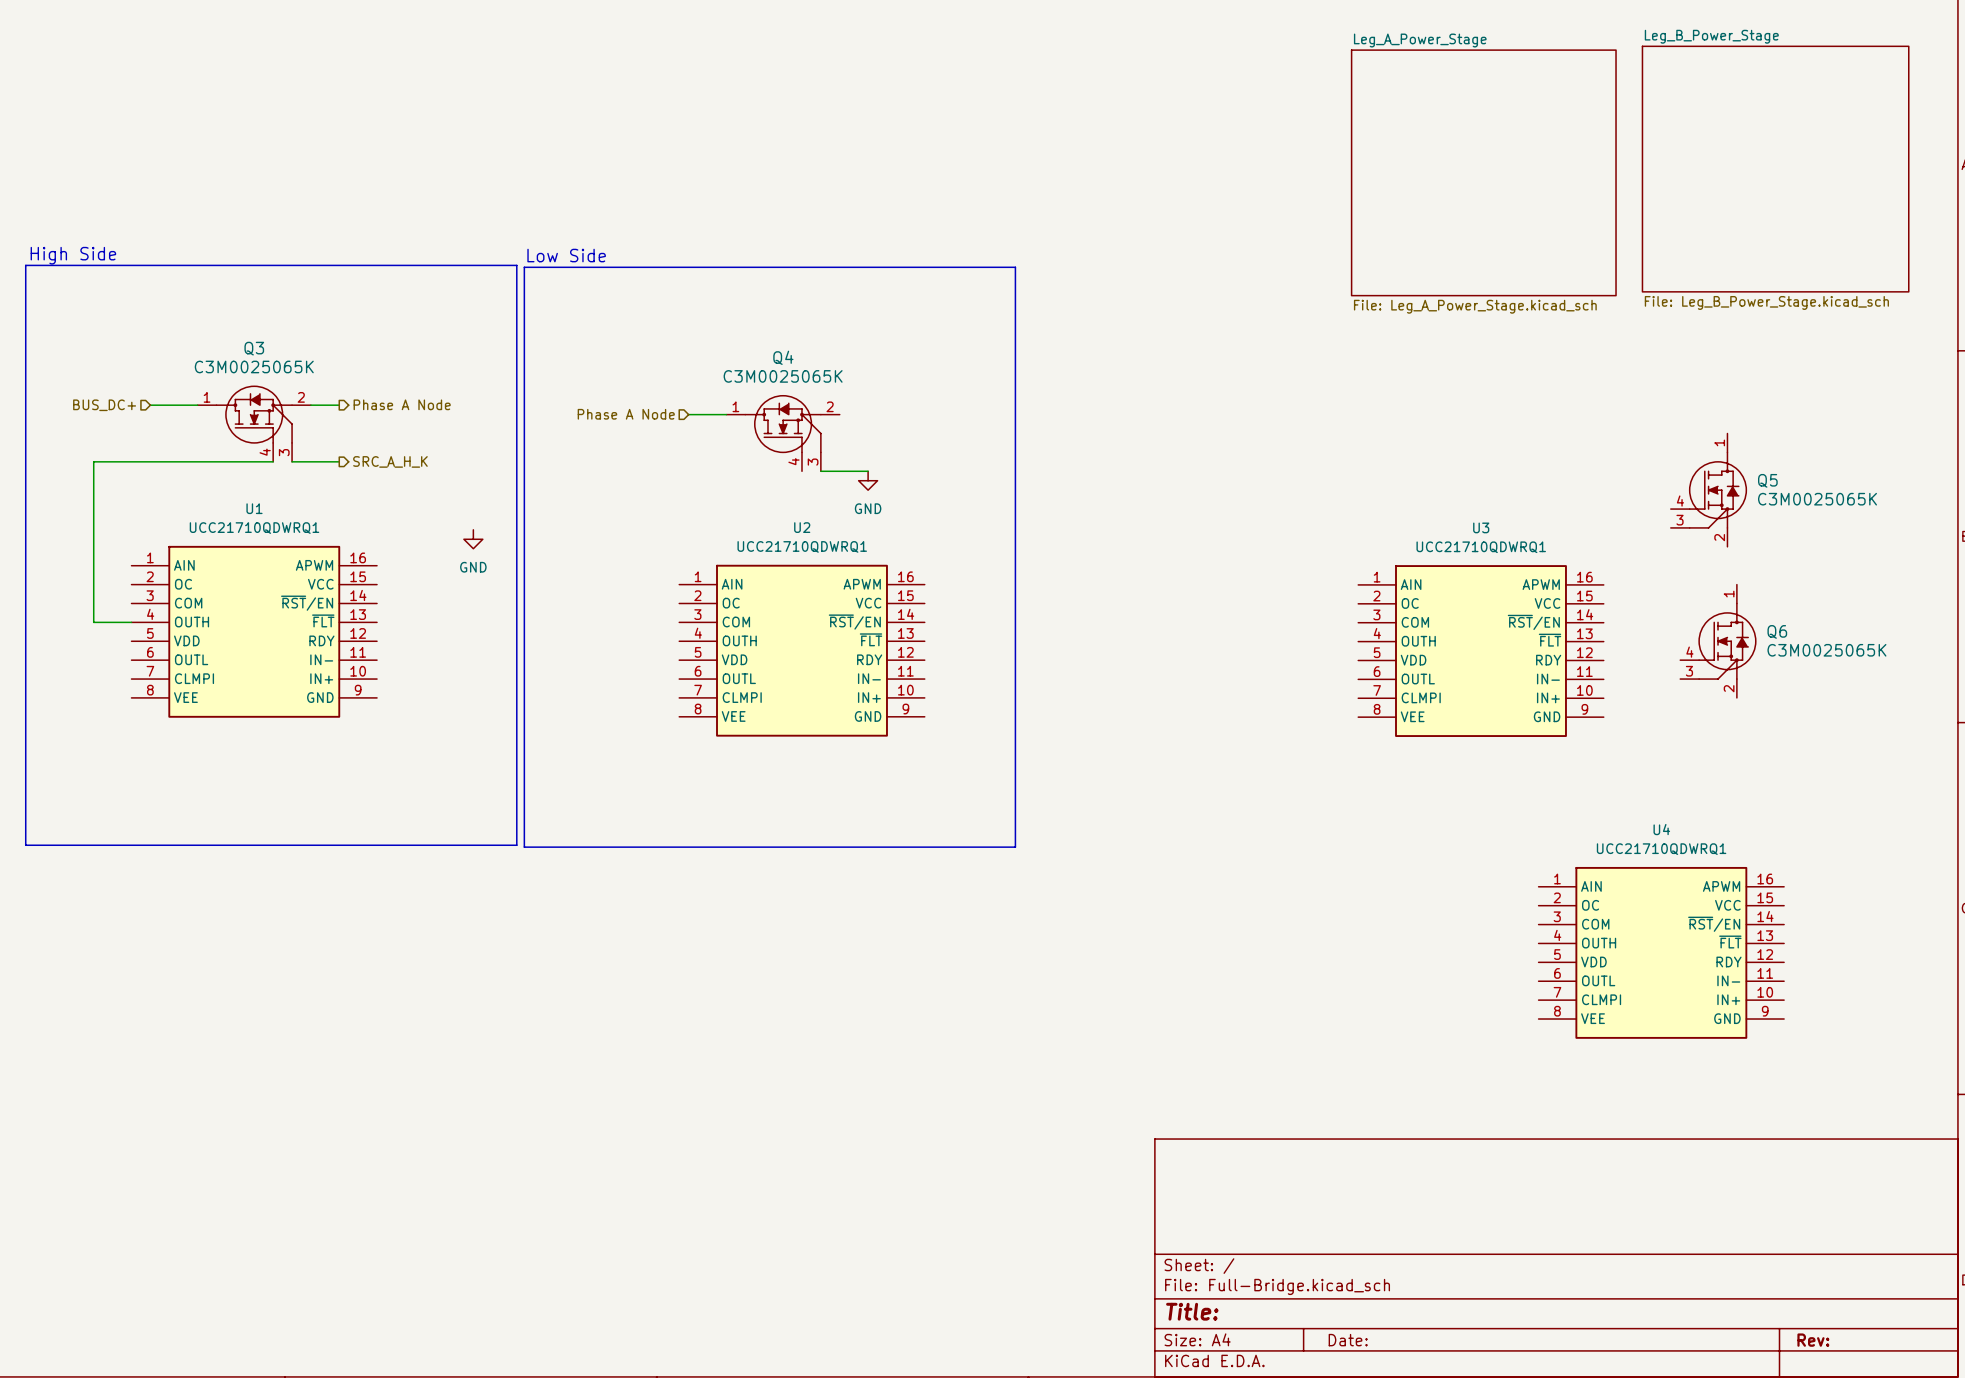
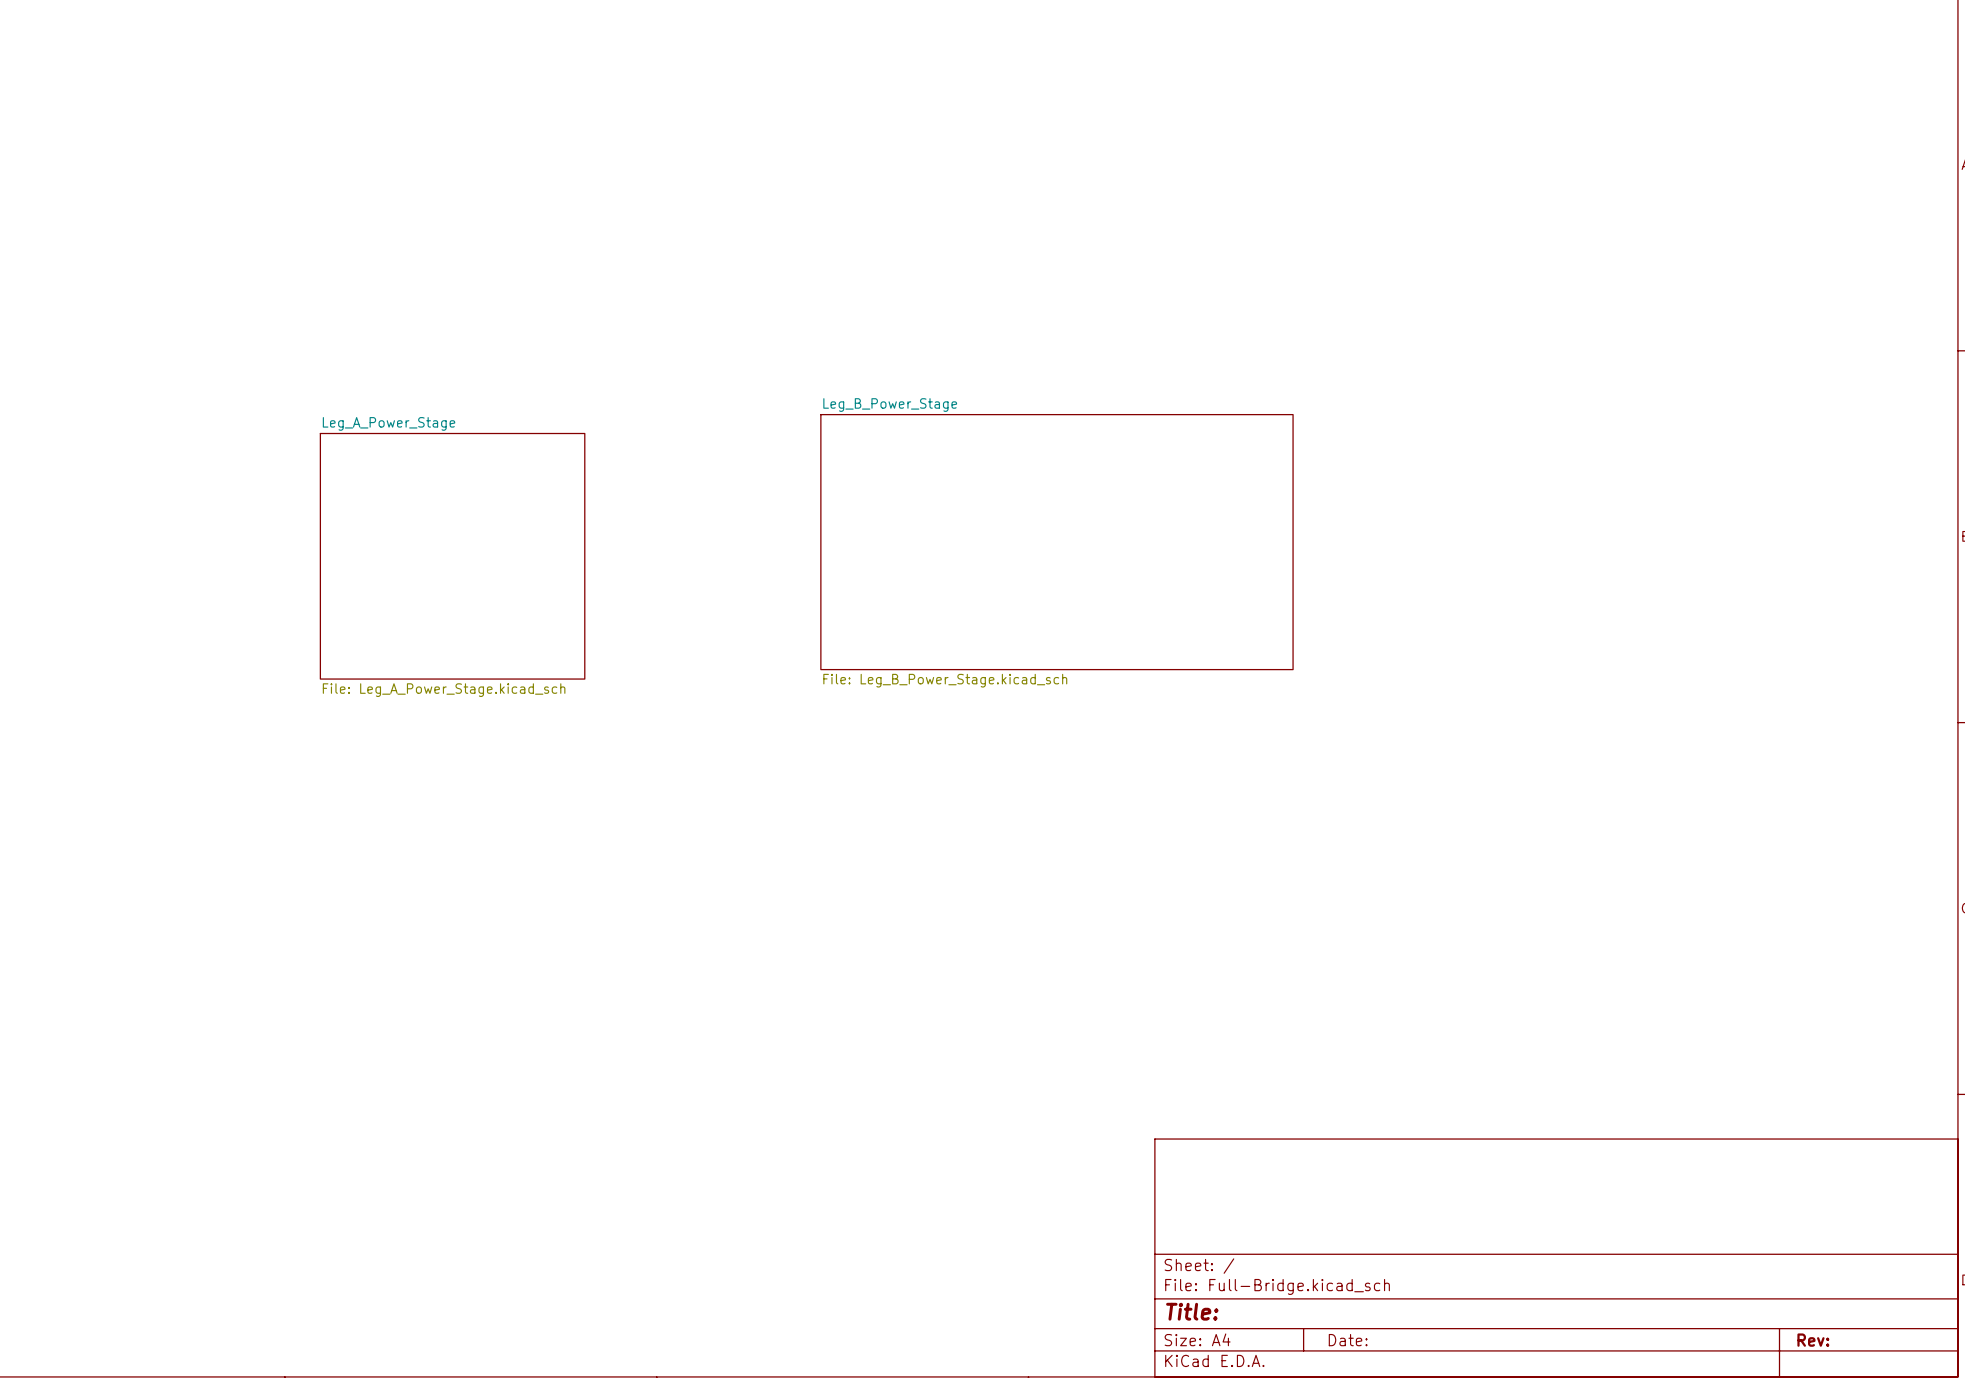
sheet Leg_B_Power_Stage: File: Leg_B_Power_Stage.kicad_sch (1775, 169) -> none
sheet Leg_A_Power_Stage: File: Leg_A_Power_Stage.kicad_sch (1483, 172) -> none
text: High Side (73, 255) -> none
text: Low Side (566, 255) -> none
line: (25, 265) (516, 265) (516, 845) (25, 845) (25, 265) -> none
line: (524, 267) (1015, 267) (1015, 847) (524, 847) (524, 267) -> none
hierarchical label: Phase A Node (402, 404) -> none
hierarchical label: BUS_DC+ (104, 405) -> none
wire: (150, 405) (197, 405) -> none
wire: (310, 405) (339, 405) -> none
hierarchical label: Phase A Node (626, 414) -> none
wire: (688, 414) (726, 414) -> none
Q3: C3M0025065K (254, 423) -> none
Q4: C3M0025065K (783, 433) -> none
wire: (273, 461) (93, 461) (93, 622) (131, 622) -> none
wire: (292, 461) (339, 461) -> none
hierarchical label: SRC_A_H_K (390, 461) -> none
wire: (820, 471) (868, 471) -> none
power symbol: GND (868, 480) -> none
Q5: C3M0025065K (1708, 490) -> none
power symbol: GND (473, 539) -> none
sheet Leg_B_Power_Stage: none -> File: Leg_B_Power_Stage.kicad_sch (1056, 542)
sheet Leg_A_Power_Stage: none -> File: Leg_A_Power_Stage.kicad_sch (452, 556)
U1: UCC21710QDWRQ1 (254, 631) -> none
Q6: C3M0025065K (1718, 641) -> none
U2: UCC21710QDWRQ1 (801, 650) -> none
U3: UCC21710QDWRQ1 (1480, 651) -> none
U4: UCC21710QDWRQ1 (1661, 952) -> none

